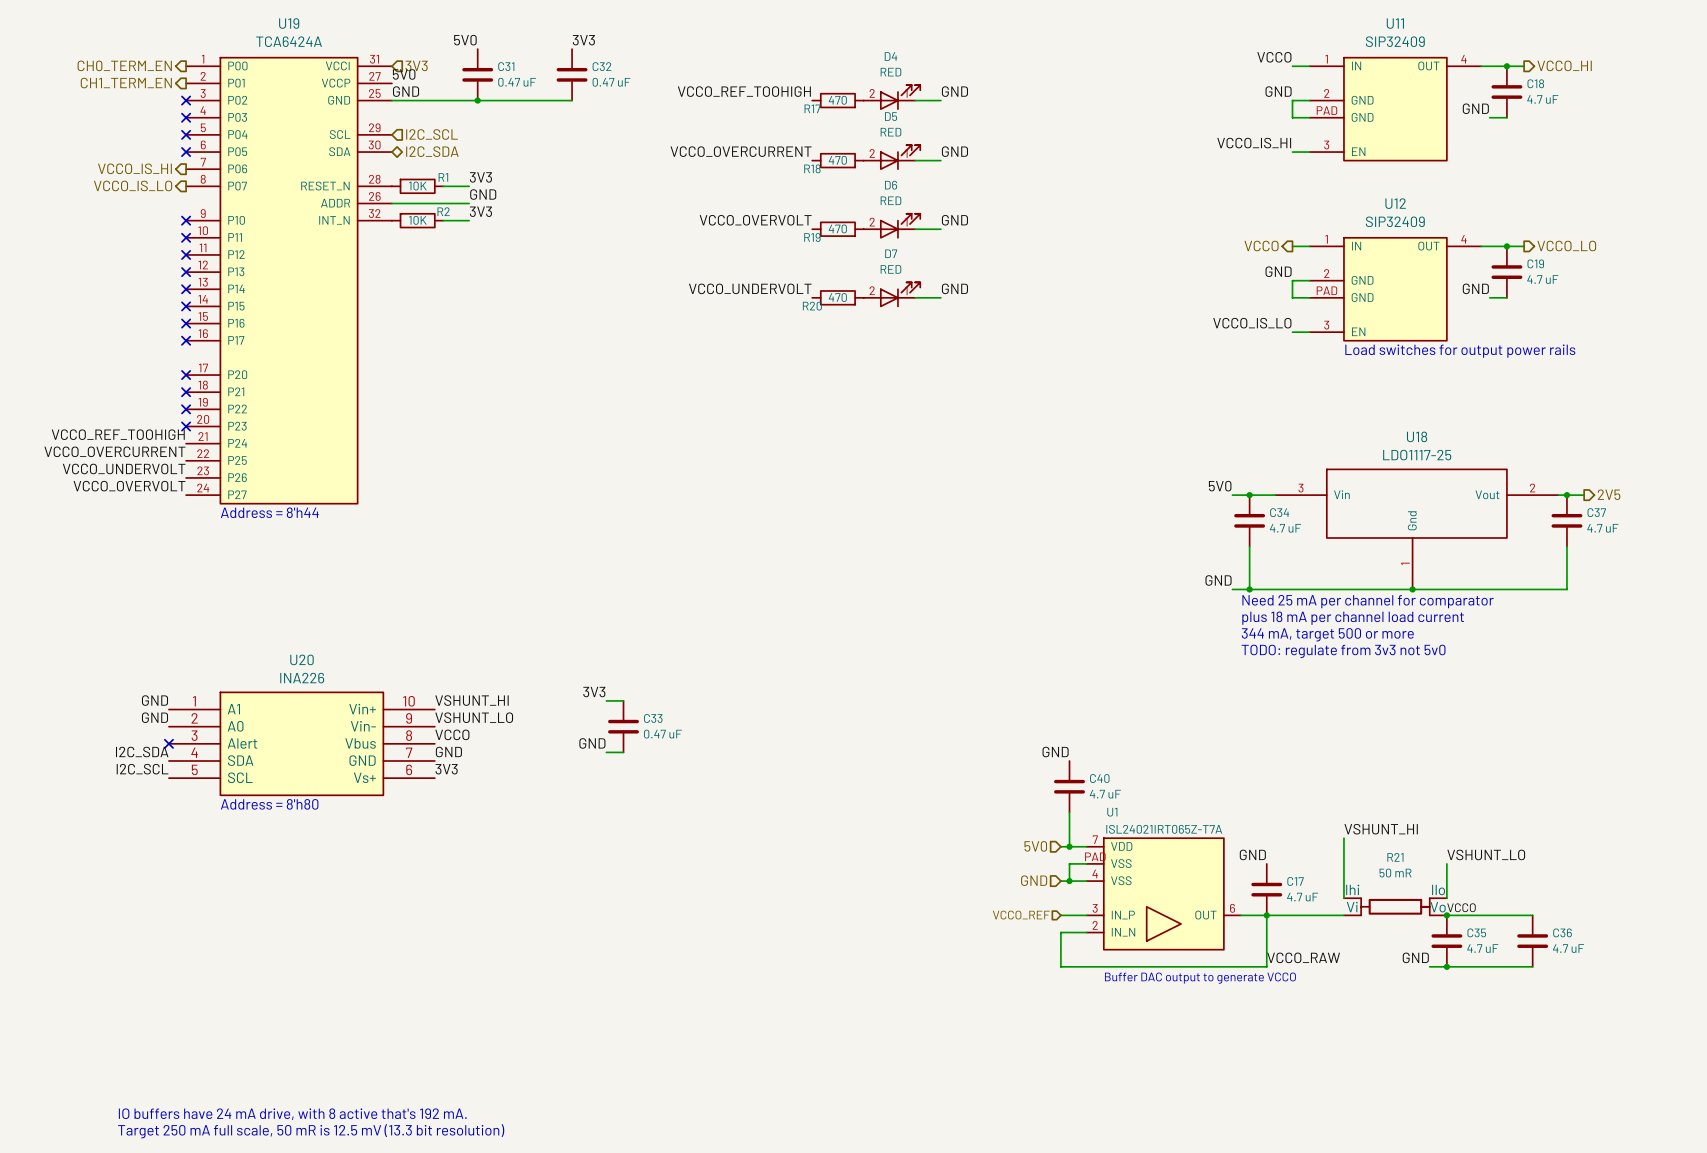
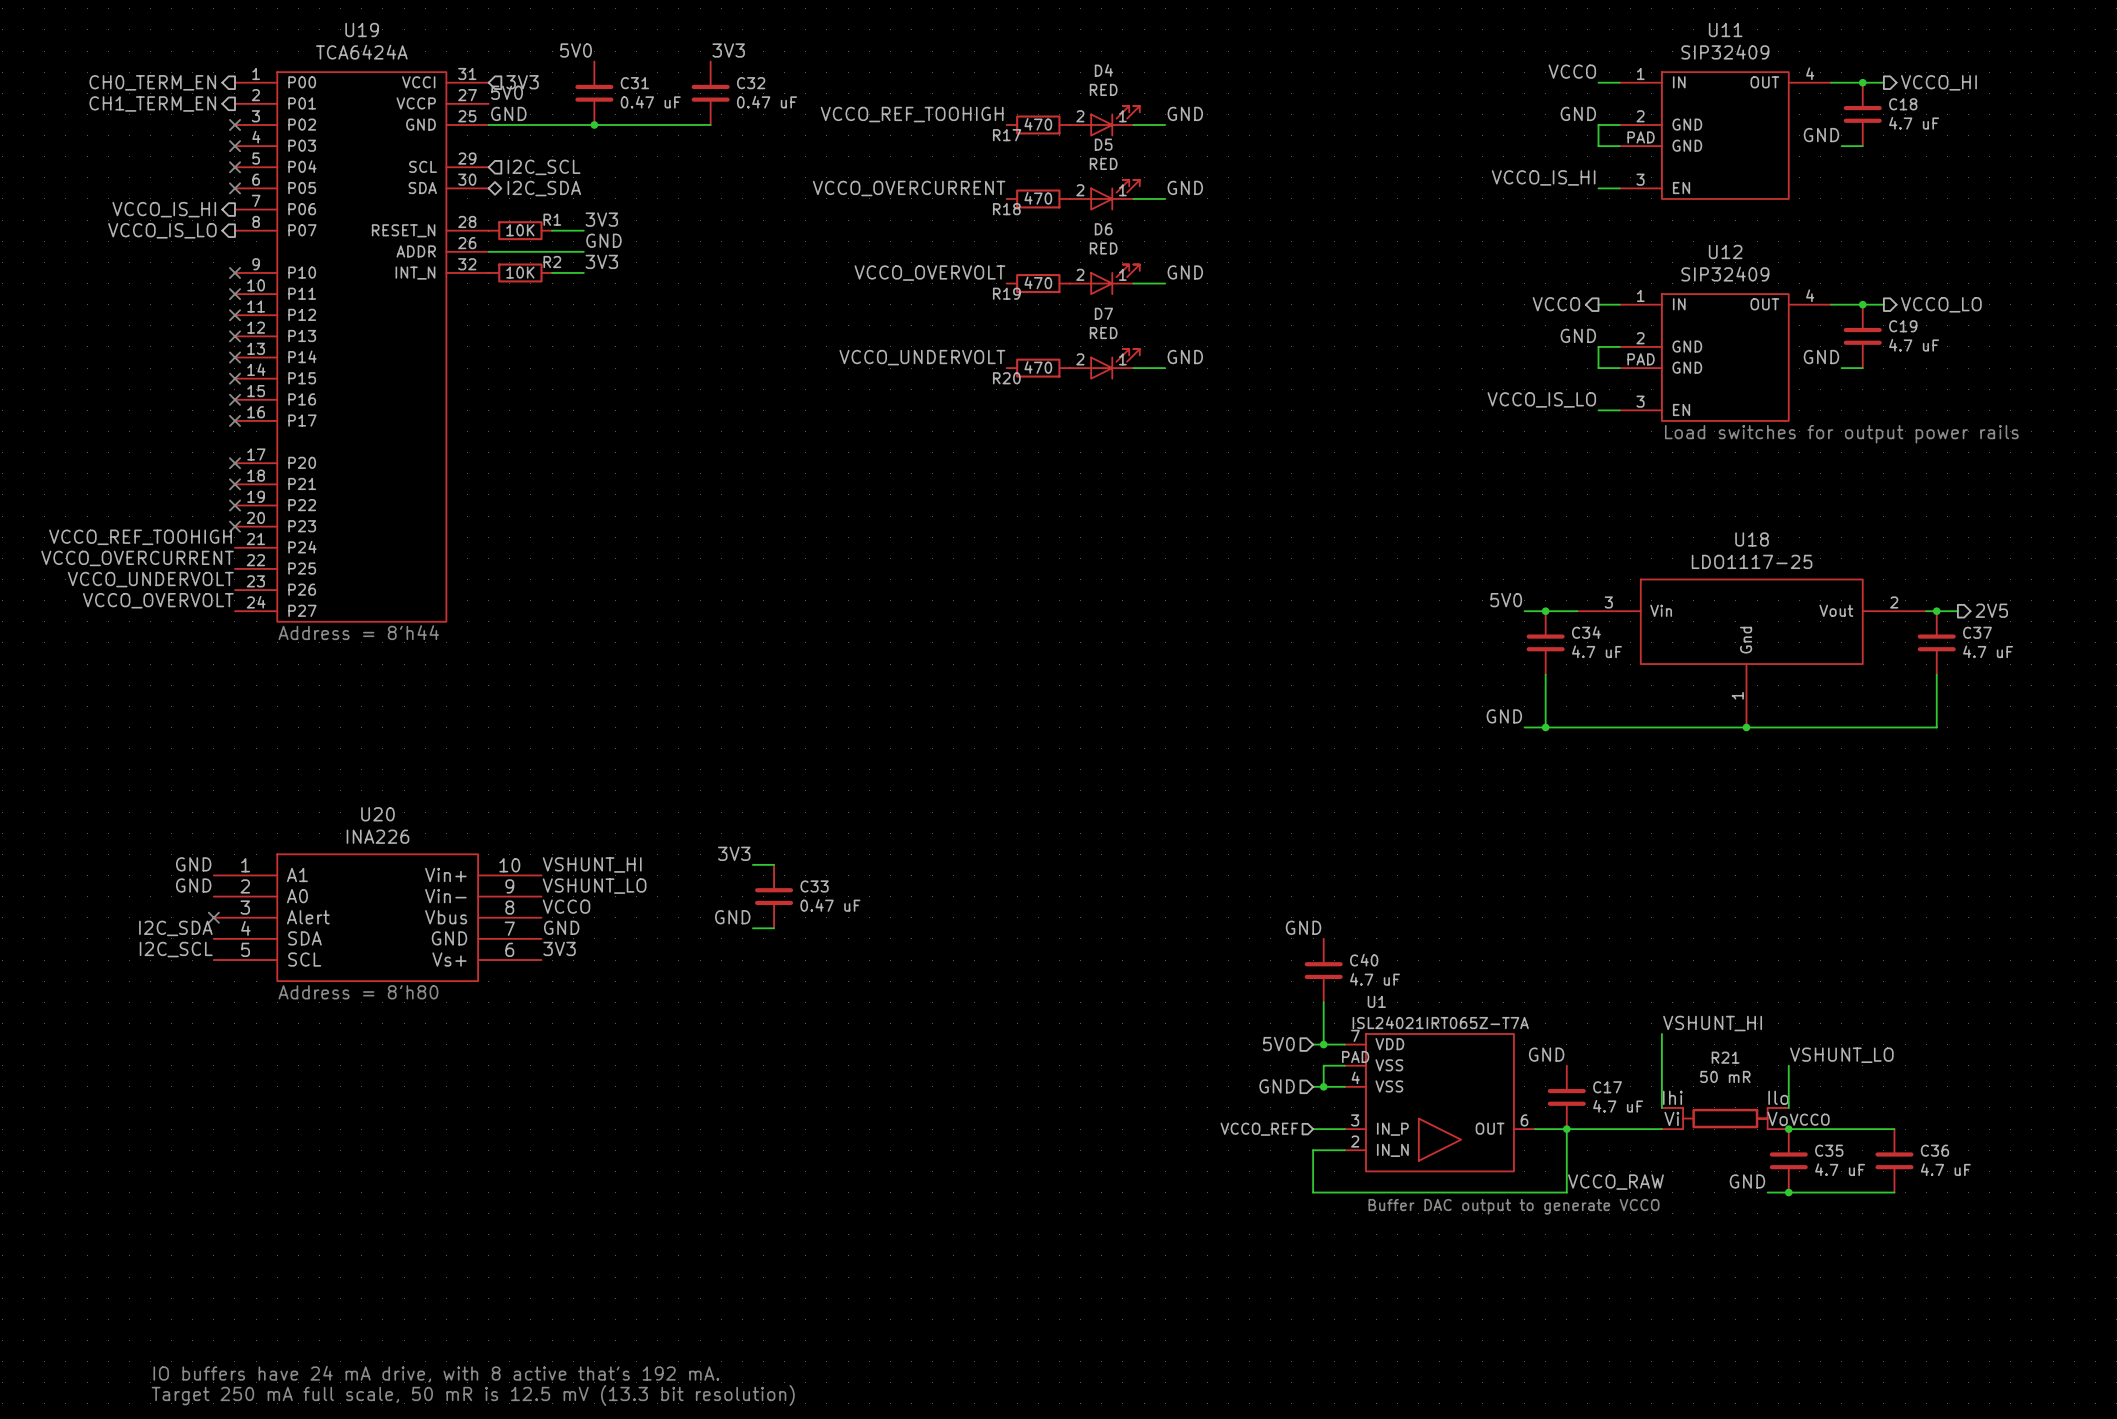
text: Need 25 mA per channel for comparator (1368, 601) -> none
text: plus 18 mA per channel load current (1353, 618) -> none
text: 344 mA, target 500 or more (1327, 634) -> none
text: TODO: regulate from 3v3 not 5v0 (1343, 651) -> none

